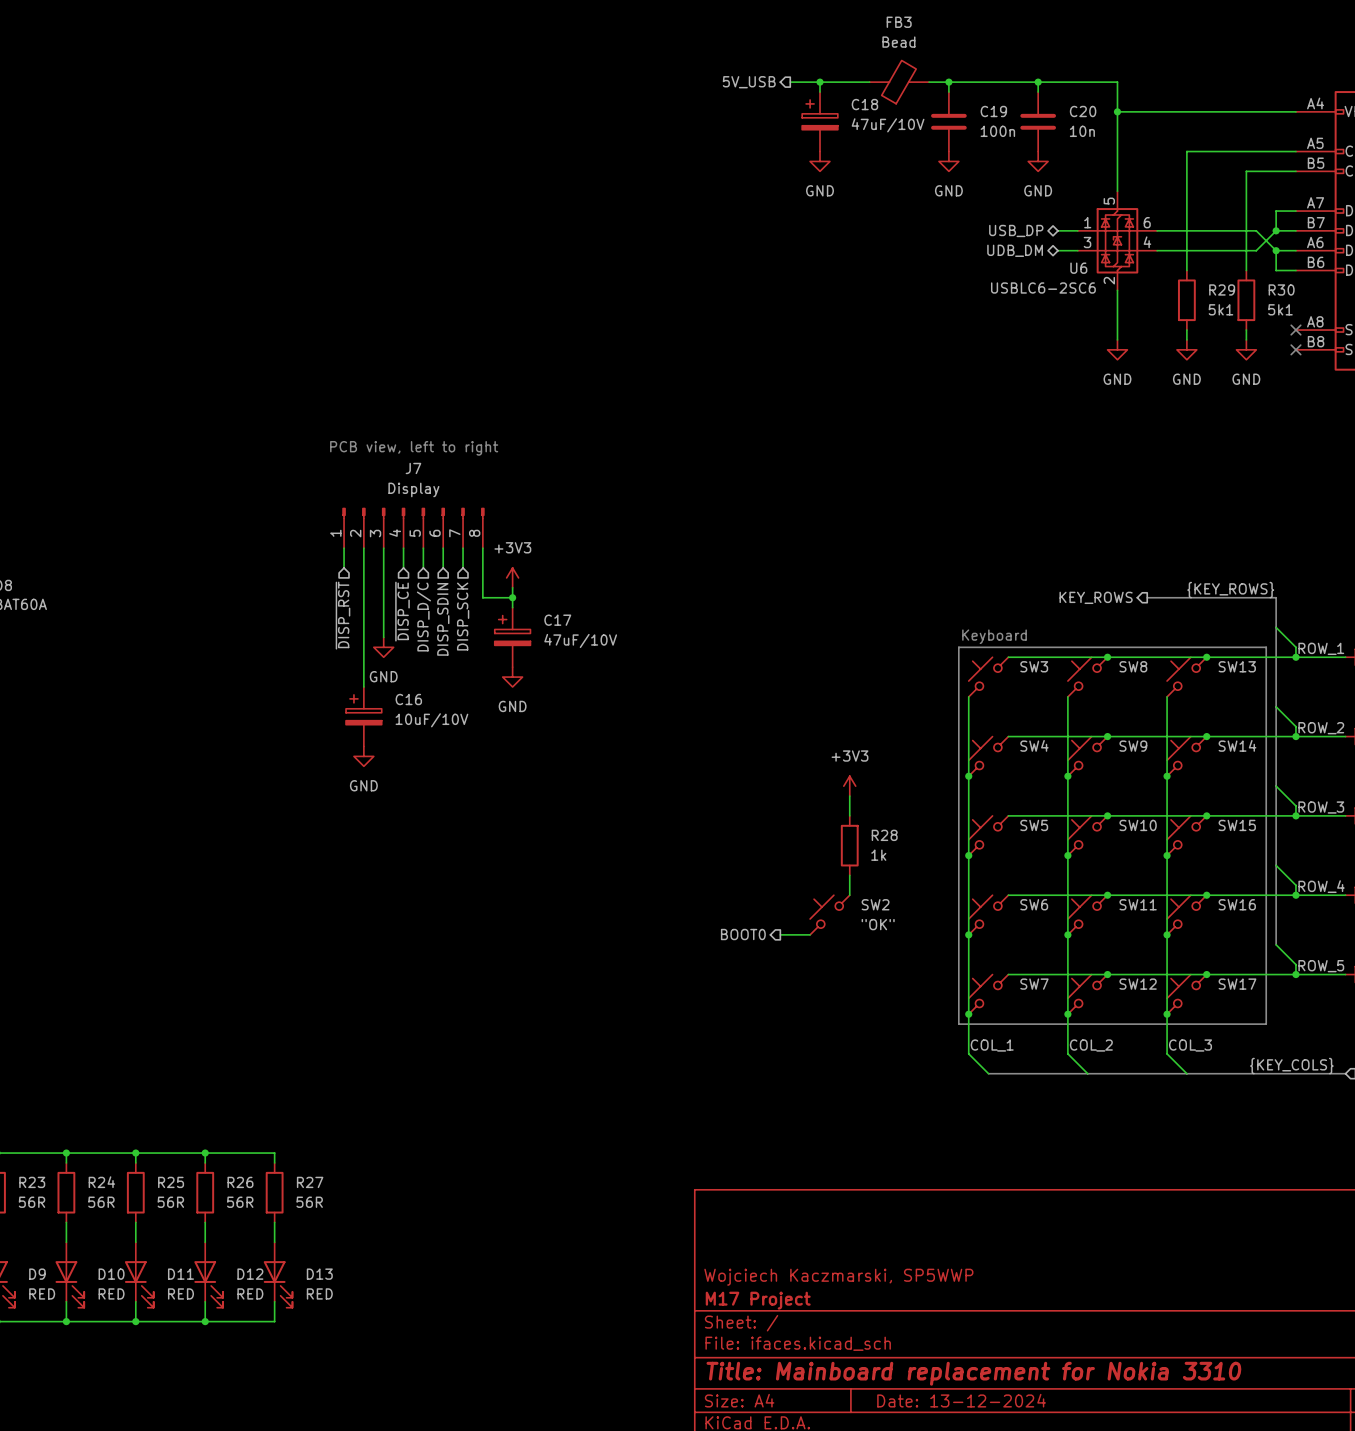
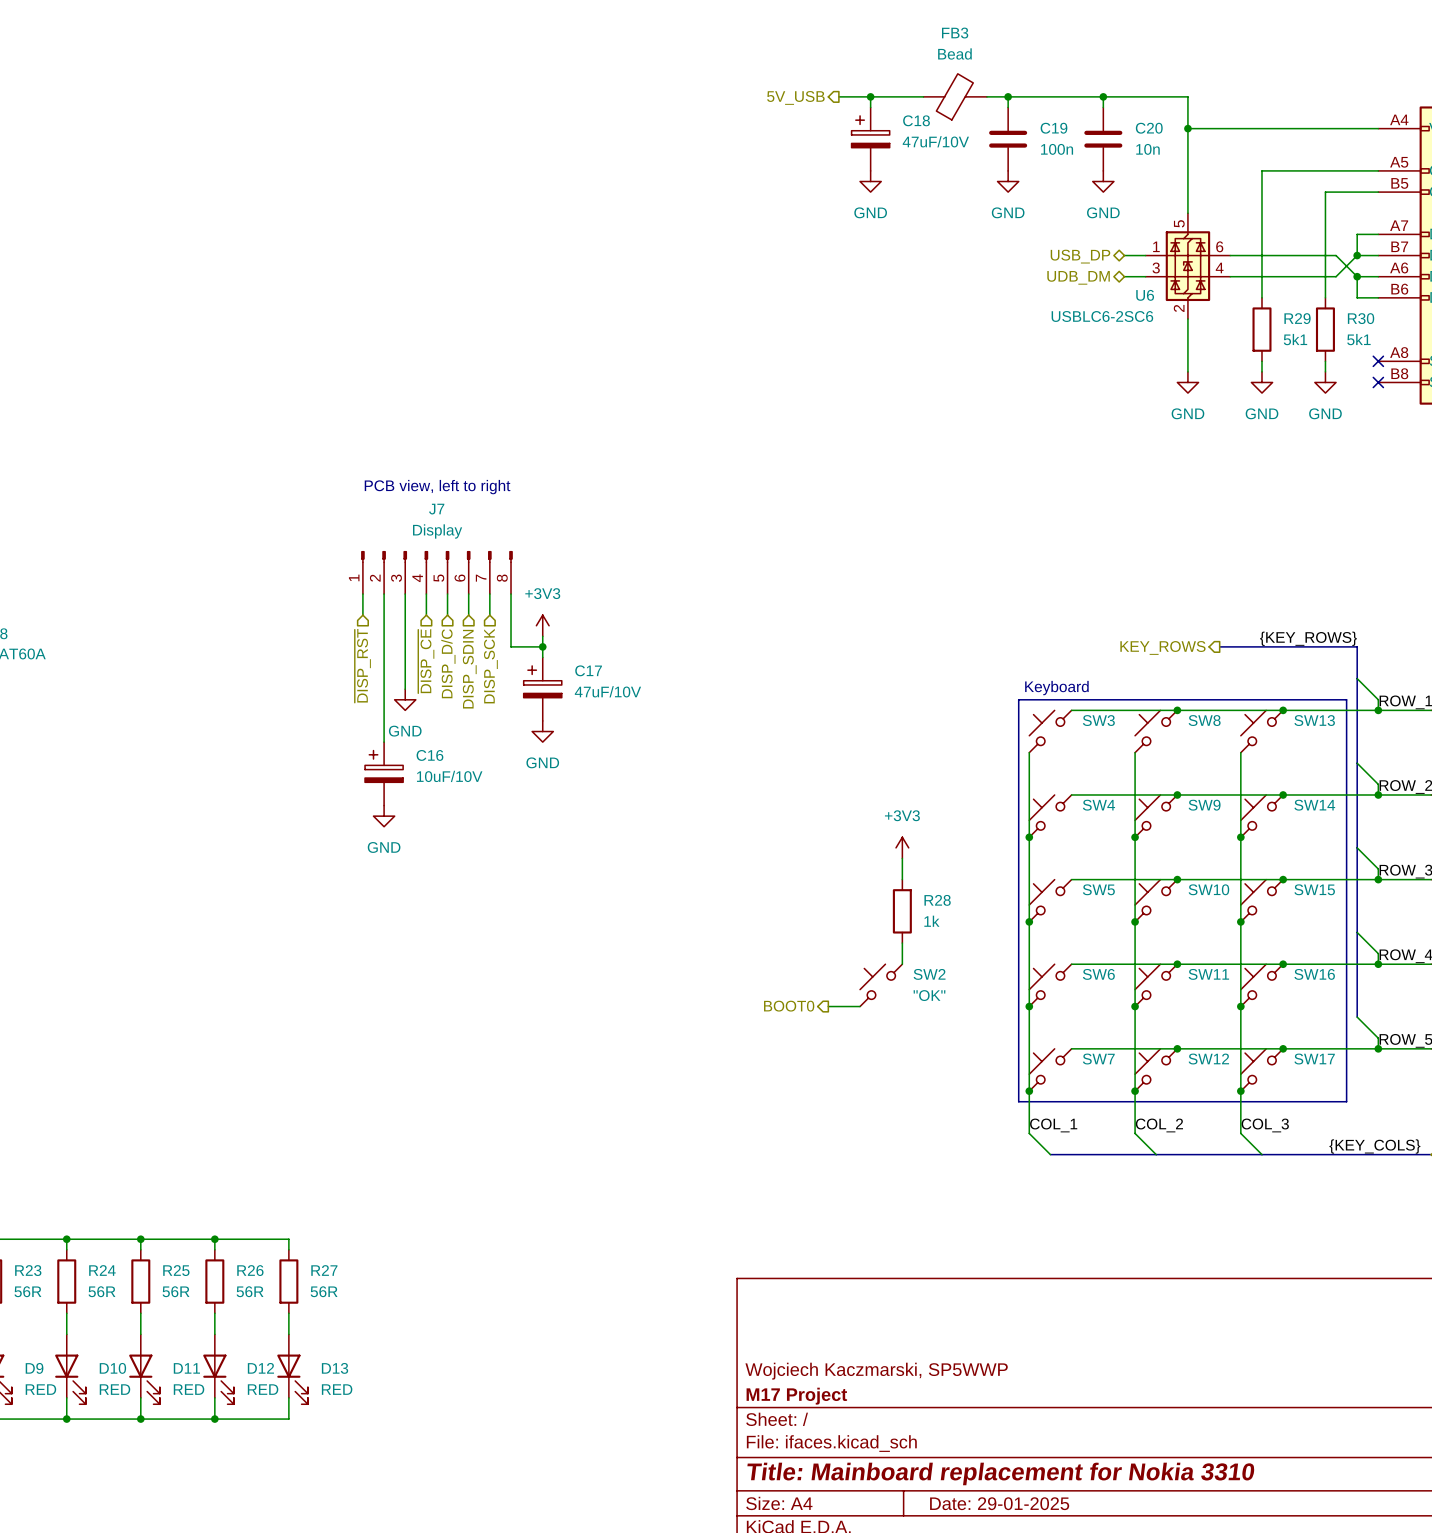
title block: Date: 13-12-2024 (961, 1400) -> Date: 29-01-2025 (999, 1503)

